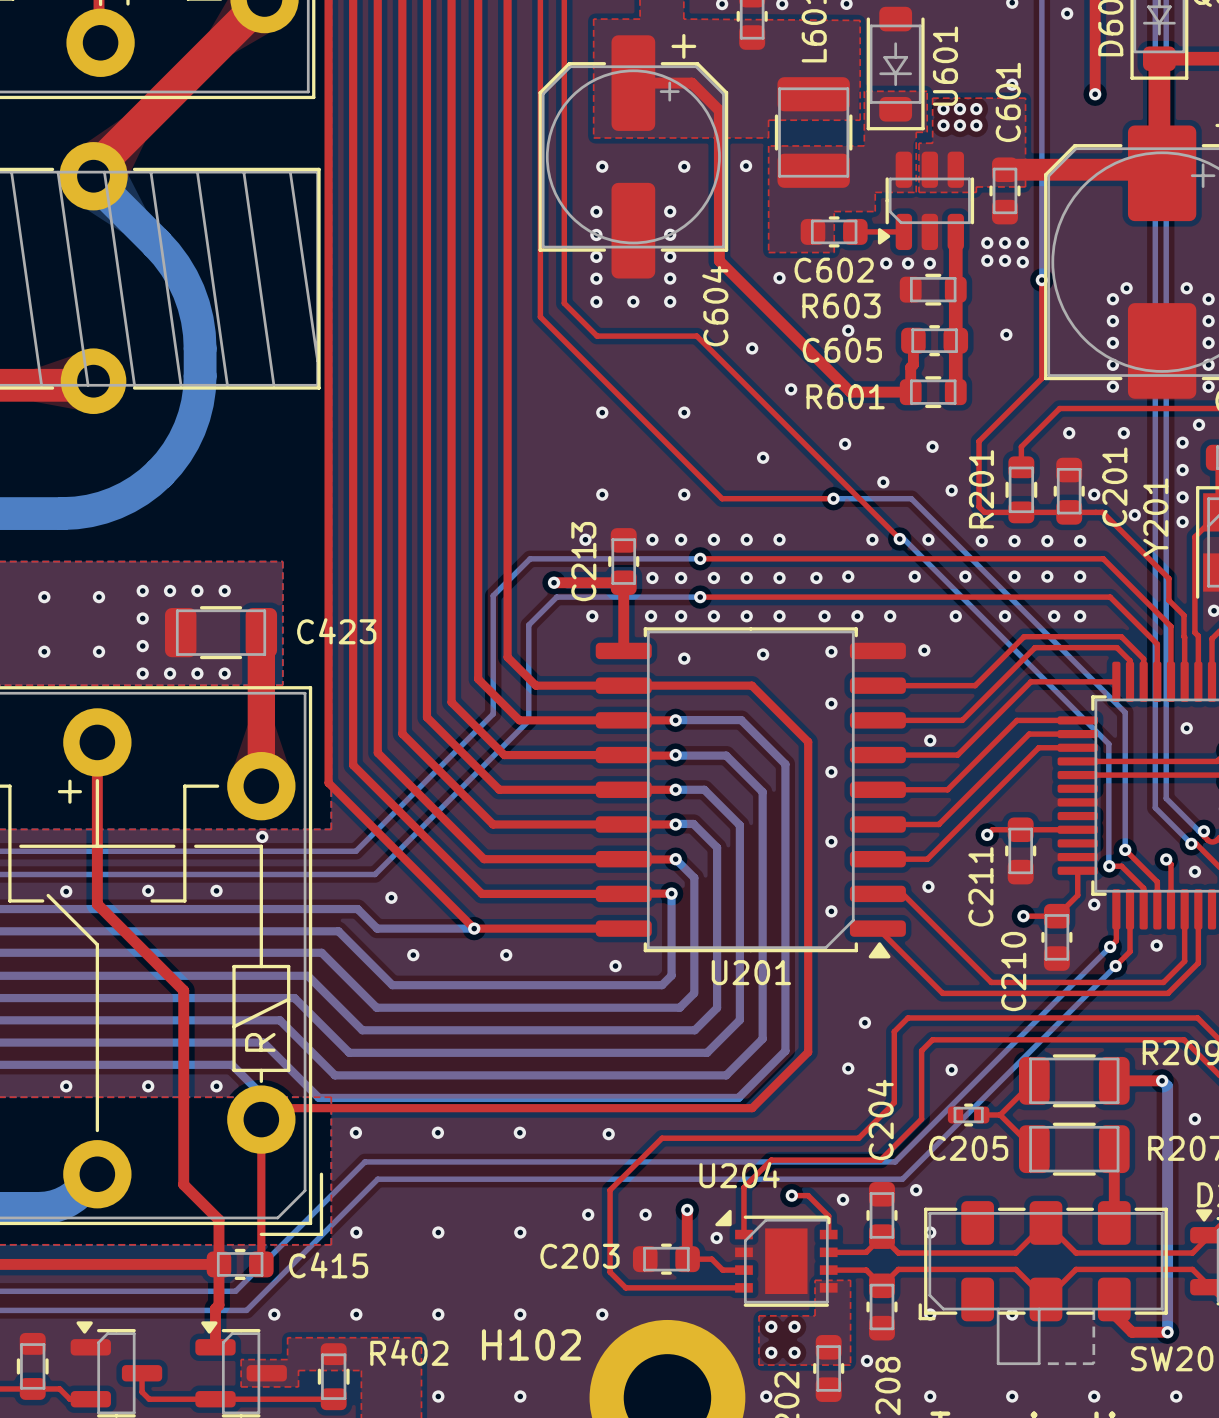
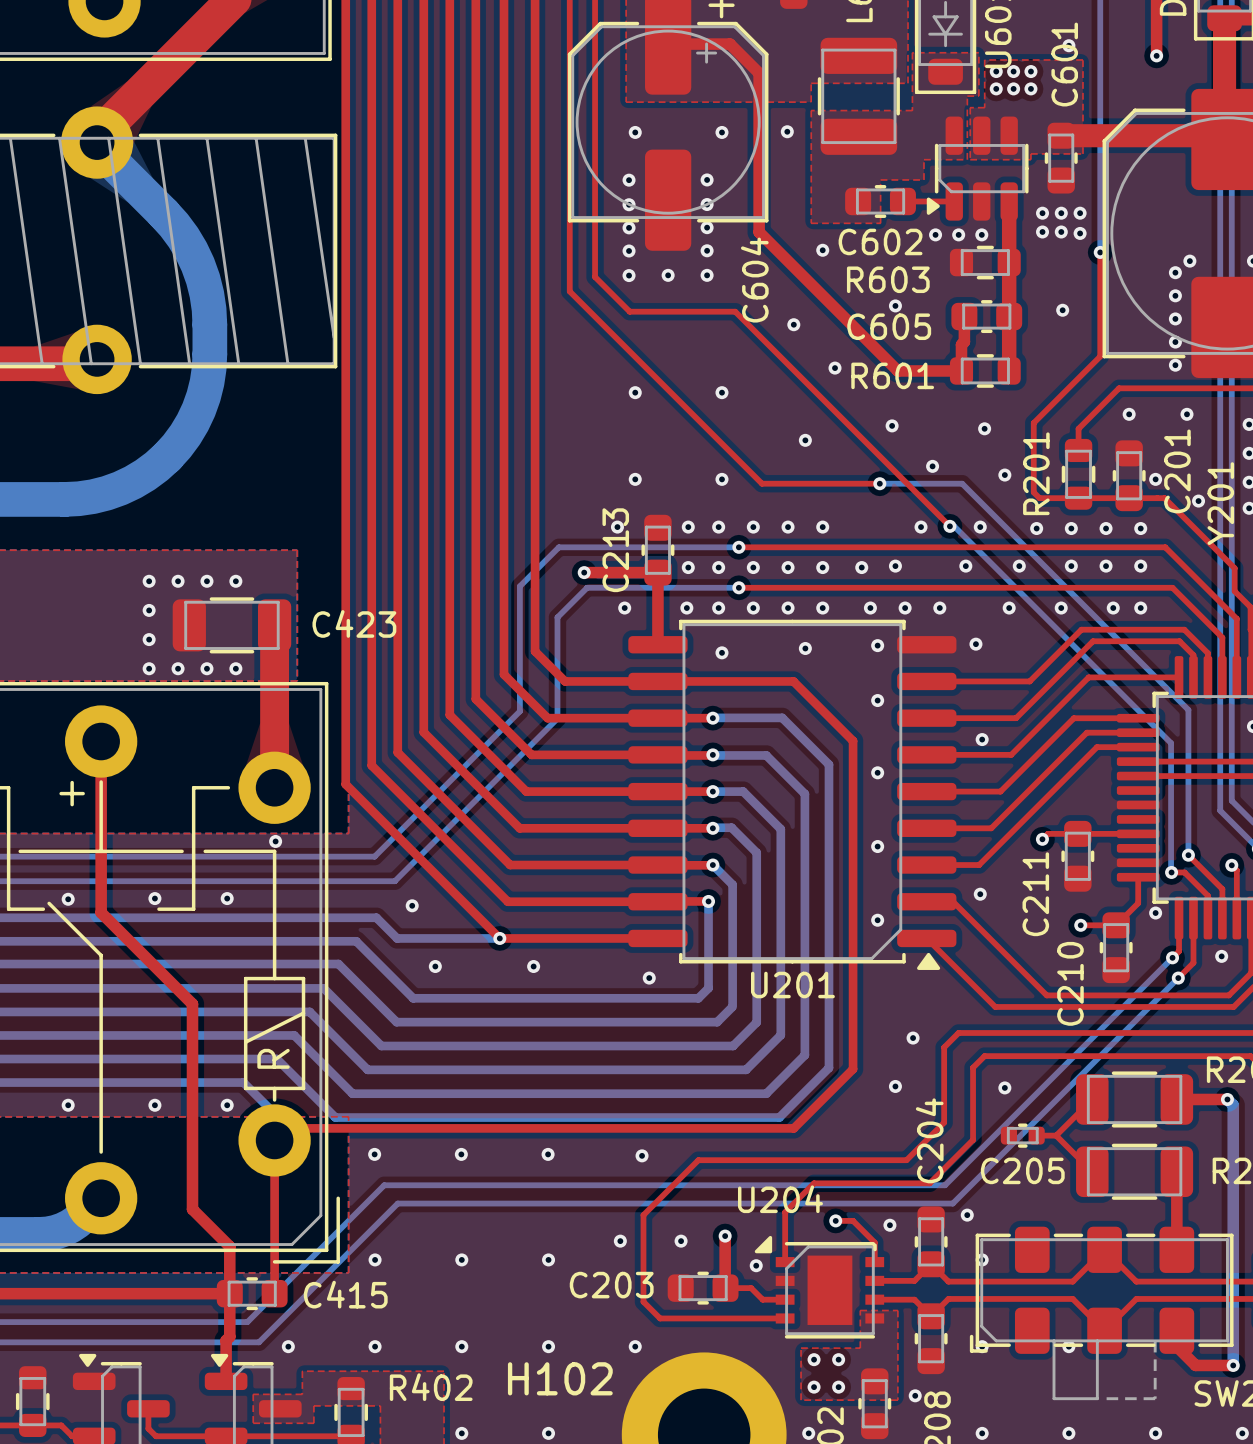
via: (44, 597) -> none
via: (99, 597) -> none
via: (44, 651) -> none
via: (99, 651) -> none

